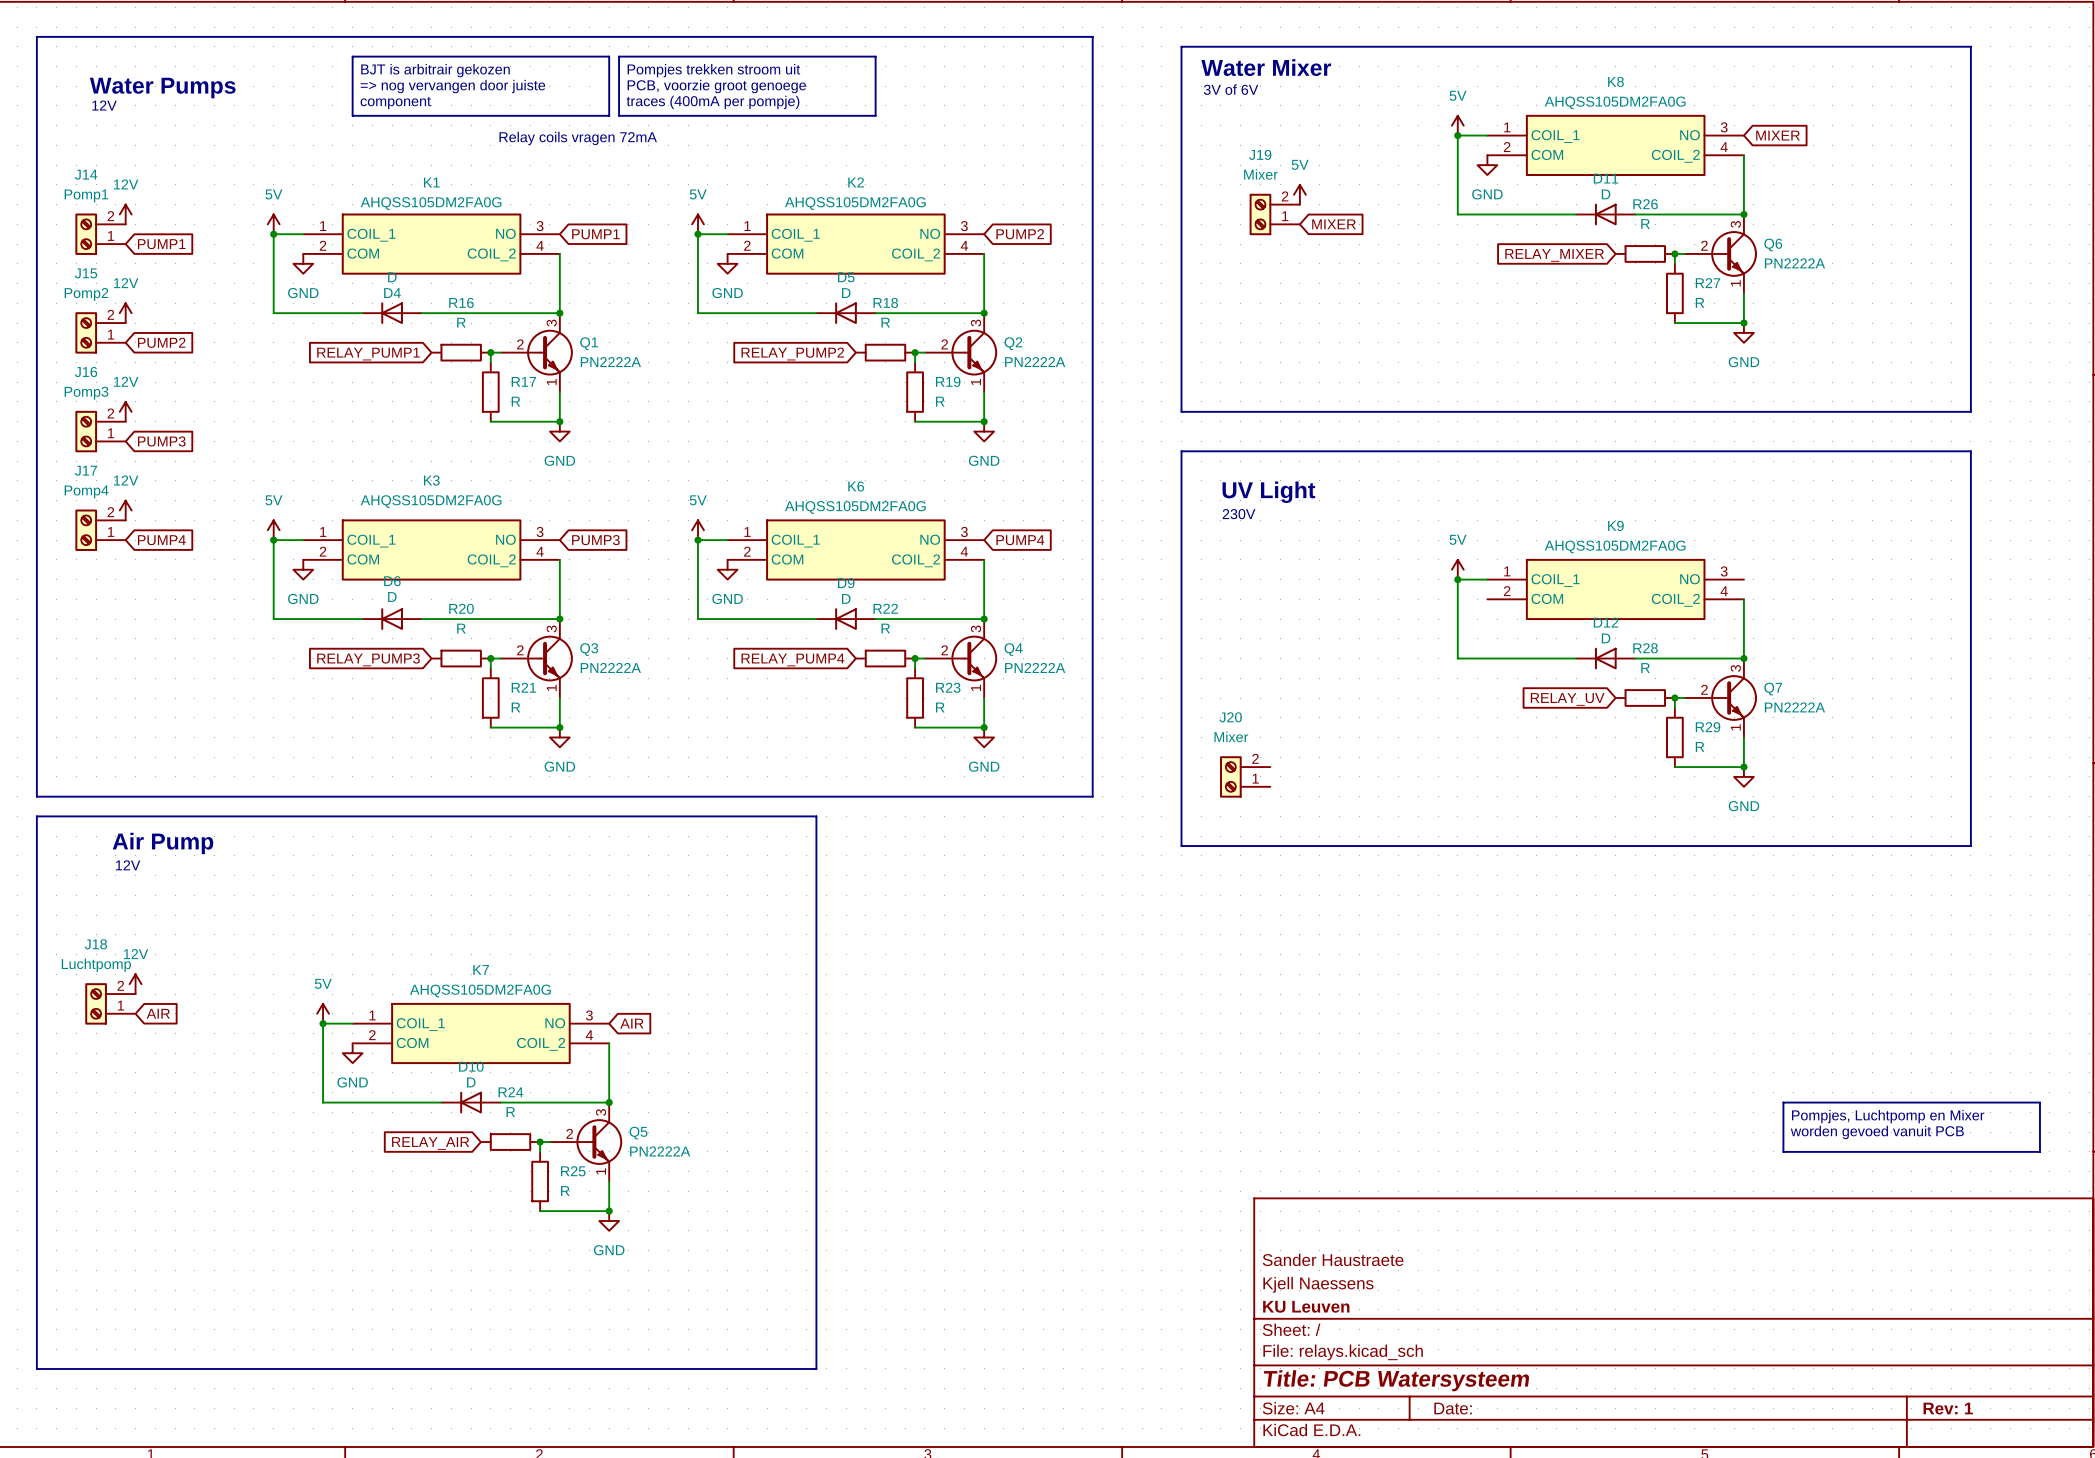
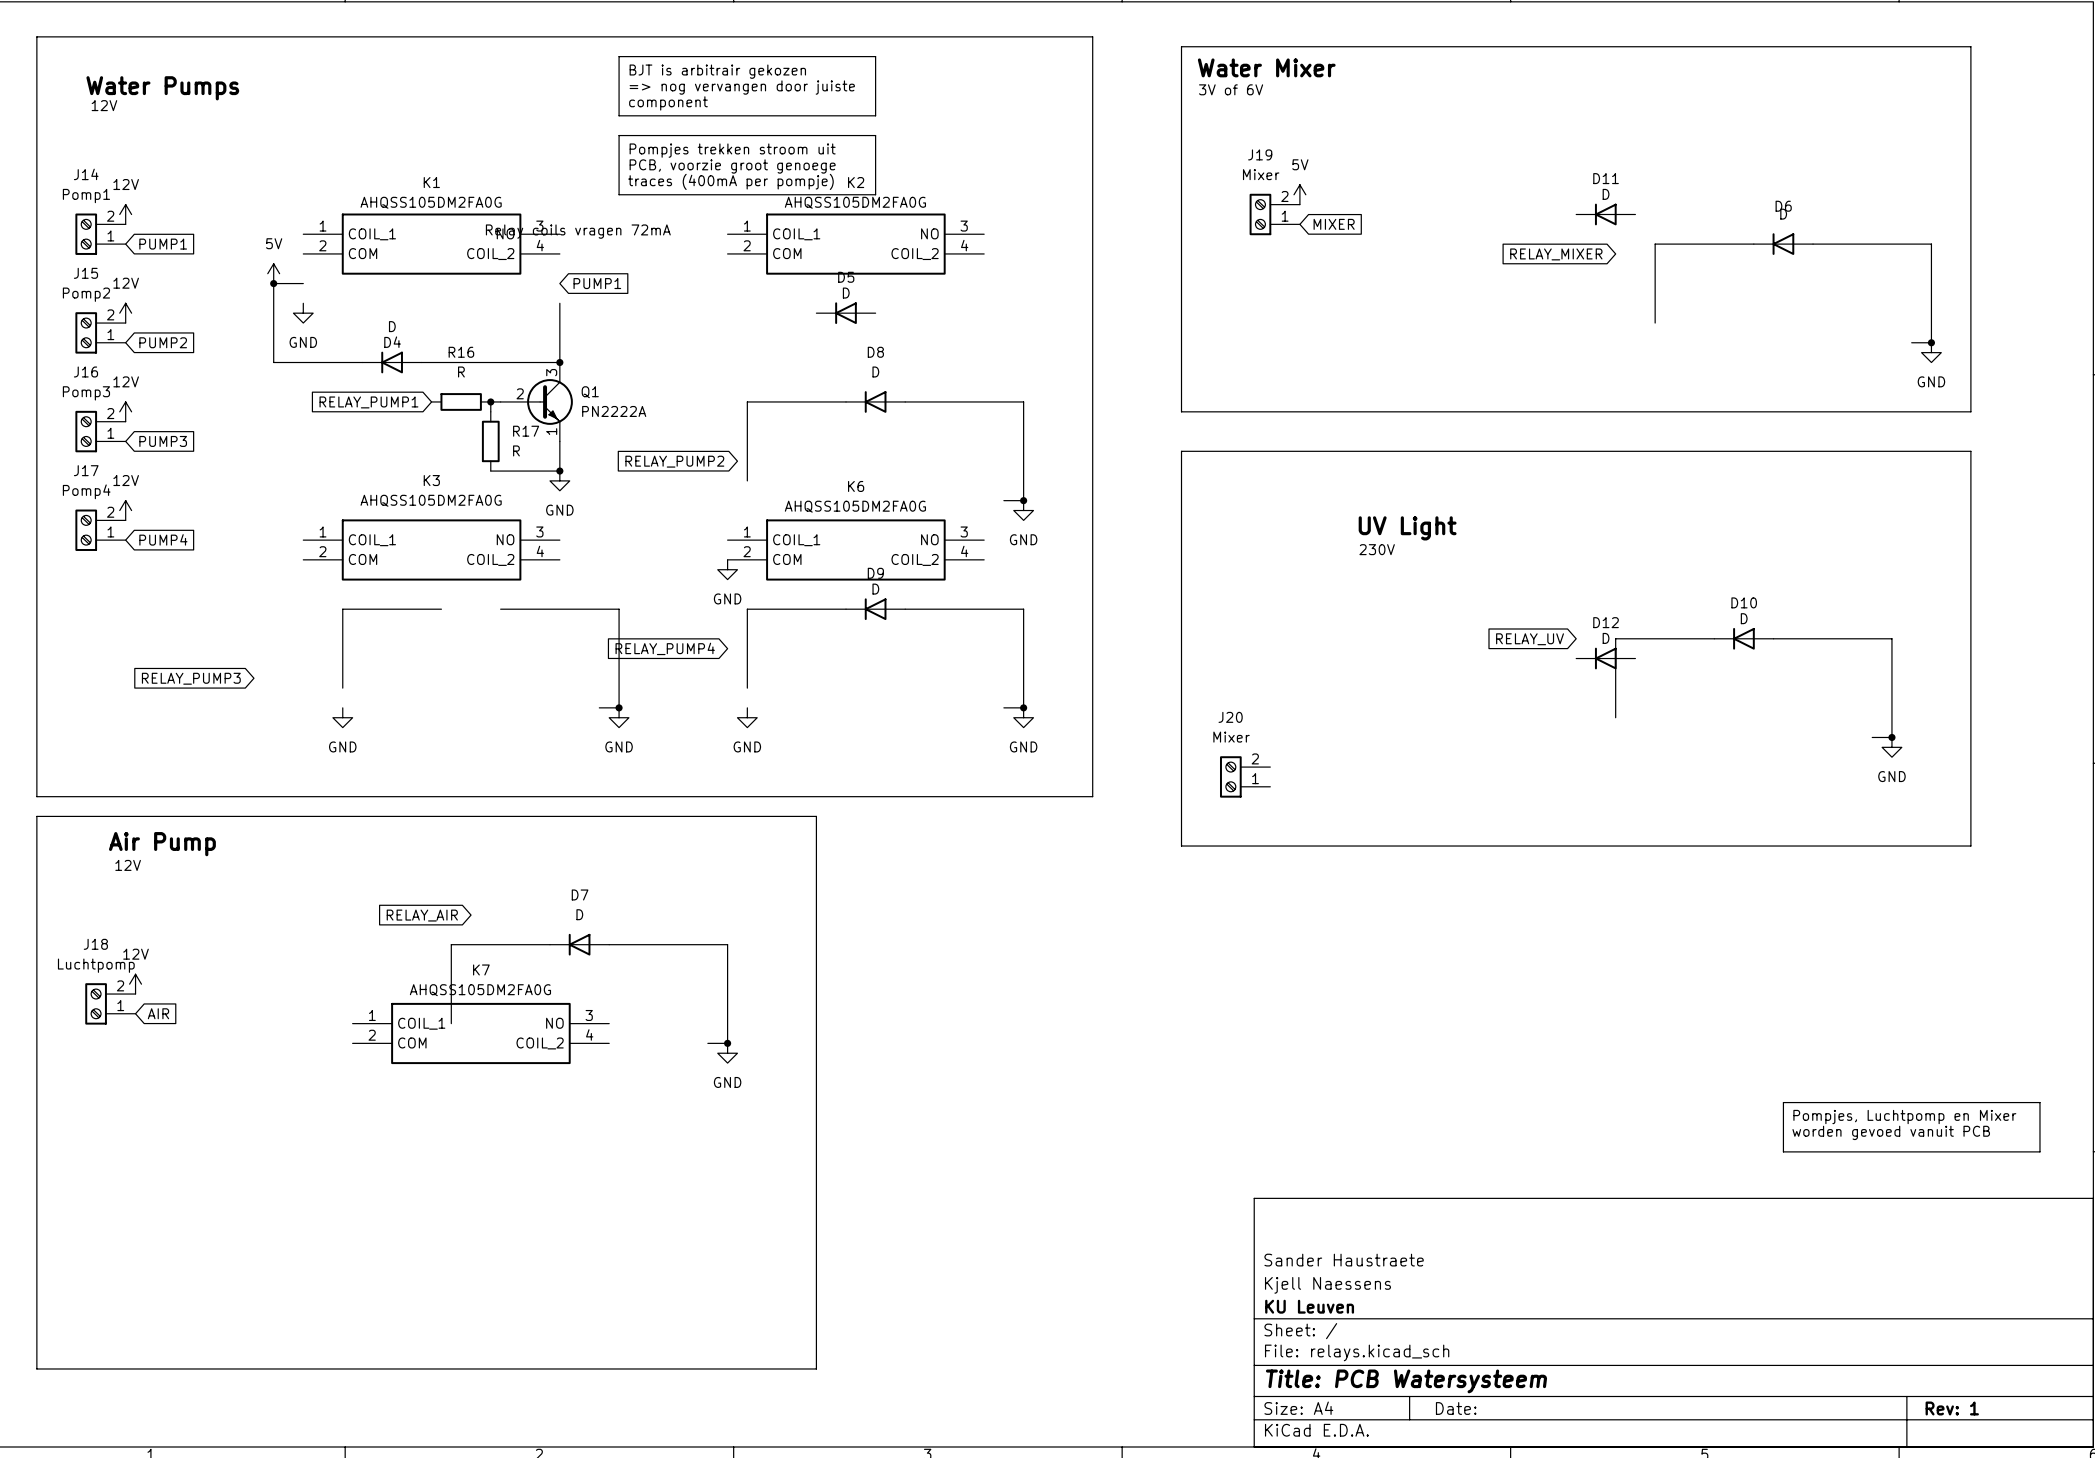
line: (352, 56) (609, 56) (609, 115) (352, 115) (352, 56) -> none
text: BJT is arbitrair gekozen (435, 70) -> none
text position: Pompjes trekken stroom uit (713, 70) -> Pompjes trekken stroom uit (732, 150)
text: none -> BJT is arbitrair gekozen (717, 71)
text: => nog vervangen door juiste (452, 86) -> none
text position: PCB, voorzie groot genoege (716, 86) -> PCB, voorzie groot genoege (732, 166)
text: none -> => nog vervangen door juiste (742, 87)
text: component (395, 102) -> none
text position: traces (400mA per pompje) (713, 102) -> traces (400mA per pompje) (730, 181)
text: none -> component (668, 103)
power symbol: 5V (1457, 125) -> none
line: none -> (619, 135) (875, 135) (875, 194) (619, 194) (619, 135)
junction: (1457, 135) -> none
wire: (1487, 135) (1457, 135) (1457, 214) (1576, 214) -> none
global label: MIXER (1778, 135) -> none
text position: Relay coils vragen 72mA (578, 138) -> Relay coils vragen 72mA (578, 231)
K8: AHQSS105DM2FA0G (1615, 145) -> none
wire: (1743, 155) (1743, 214) (1635, 214) -> none
power symbol: GND (1487, 165) -> none
junction: (1743, 214) -> none
power symbol position: 5V (273, 224) -> 5V (273, 273)
power symbol: 5V (698, 224) -> none
junction: (273, 234) -> none
wire: (303, 234) (273, 234) (273, 283) -> (303, 283) (273, 283)
global label position: PUMP1 (595, 234) -> PUMP1 (597, 283)
junction: (698, 234) -> none
wire: (727, 234) (698, 234) (698, 313) (816, 313) -> none
global label: PUMP2 (1020, 234) -> none
wire: none -> (1753, 244) (1655, 244) (1655, 323)
wire: none -> (1813, 244) (1931, 244) (1931, 342) (1911, 342)
wire: (559, 253) (559, 303) -> none
wire: (984, 253) (984, 313) (875, 313) -> none
R26: R (1645, 253) -> none
junction: (1674, 253) -> none
wire: (1684, 253) (1674, 253) (1674, 263) -> none
Q6: PN2222A (1720, 253) -> none
power symbol position: GND (303, 263) -> GND (303, 313)
power symbol: GND (727, 263) -> none
junction: none -> (273, 283)
R27: R (1674, 293) -> none
wire: (1743, 293) (1743, 323) (1674, 323) -> none
wire: (273, 313) (362, 313) -> (273, 313) (273, 362) (362, 362)
D4 position: (392, 313) -> (392, 362)
wire: (421, 313) (559, 313) -> (421, 362) (559, 362) (559, 313)
junction: (559, 313) -> none
junction: (984, 313) -> none
junction: (1743, 323) -> none
power symbol position: GND (1743, 332) -> GND (1931, 352)
junction: none -> (1931, 342)
R16 position: (461, 352) -> (461, 401)
junction: (490, 352) -> none
wire: (500, 352) (490, 352) (490, 362) -> (500, 401) (490, 401) (490, 411)
Q1 position: (536, 352) -> (536, 401)
R18: R (885, 352) -> none
junction: (915, 352) -> none
wire: (924, 352) (915, 352) (915, 362) -> none
Q2: PN2222A (961, 352) -> none
global label position: RELAY_PUMP2 (792, 353) -> RELAY_PUMP2 (674, 461)
global label position: RELAY_PUMP1 (368, 354) -> RELAY_PUMP1 (368, 402)
junction: none -> (559, 362)
R17 position: (490, 392) -> (490, 441)
wire: (559, 392) (559, 421) (490, 421) -> (559, 441) (559, 471) (490, 471)
R19: R (915, 392) -> none
wire: (984, 392) (984, 421) (915, 421) -> none
junction: none -> (490, 401)
wire: none -> (846, 401) (747, 401) (747, 480)
D8: none -> D (875, 401)
wire: none -> (905, 401) (1023, 401) (1023, 500) (1003, 500)
junction: (559, 421) -> none
junction: (984, 421) -> none
power symbol position: GND (559, 431) -> GND (559, 480)
power symbol position: GND (984, 431) -> GND (1023, 510)
junction: none -> (559, 471)
text position: UV Light (1268, 492) -> UV Light (1407, 528)
junction: none -> (1023, 500)
text position: 230V (1239, 514) -> 230V (1377, 549)
power symbol: 5V (273, 530) -> none
power symbol: 5V (698, 530) -> none
junction: (273, 540) -> none
wire: (303, 540) (273, 540) (273, 619) (362, 619) -> none
global label: PUMP3 (595, 540) -> none
junction: (698, 540) -> none
wire: (727, 540) (698, 540) (698, 619) (816, 619) -> none
global label: PUMP4 (1020, 540) -> none
wire: (559, 559) (559, 619) (421, 619) -> none
wire: (984, 559) (984, 619) (875, 619) -> none
power symbol: GND (303, 569) -> none
power symbol: 5V (1457, 569) -> none
junction: (1457, 579) -> none
wire: (1487, 579) (1457, 579) (1457, 658) (1576, 658) -> none
K9: AHQSS105DM2FA0G (1615, 589) -> none
D6 value position: D (392, 596) -> D (1783, 214)
wire: (1743, 599) (1743, 658) (1635, 658) -> none
wire: none -> (441, 609) (342, 609) (342, 688)
wire: none -> (500, 609) (619, 609) (619, 707) (599, 707)
wire: none -> (846, 609) (747, 609) (747, 688)
wire: none -> (905, 609) (1023, 609) (1023, 707) (1003, 707)
D6 position: (392, 619) -> (1783, 244)
junction: (559, 619) -> none
D9 position: (846, 619) -> (875, 609)
junction: (984, 619) -> none
wire: none -> (1714, 638) (1615, 638) (1615, 717)
wire: none -> (1773, 638) (1891, 638) (1891, 737) (1872, 737)
R20: R (461, 658) -> none
junction: (490, 658) -> none
wire: (500, 658) (490, 658) (490, 668) -> none
Q3: PN2222A (536, 658) -> none
R22: R (885, 658) -> none
junction: (915, 658) -> none
wire: (924, 658) (915, 658) (915, 668) -> none
Q4: PN2222A (961, 658) -> none
junction: (1743, 658) -> none
global label position: RELAY_PUMP3 (368, 659) -> RELAY_PUMP3 (191, 678)
global label position: RELAY_PUMP4 (792, 659) -> RELAY_PUMP4 (665, 648)
R21: R (490, 698) -> none
wire: (559, 698) (559, 727) (490, 727) -> none
R23: R (915, 698) -> none
wire: (984, 698) (984, 727) (915, 727) -> none
R28: R (1645, 698) -> none
junction: (1674, 698) -> none
wire: (1684, 698) (1674, 698) (1674, 707) -> none
Q7: PN2222A (1720, 698) -> none
global label position: RELAY_UV (1567, 699) -> RELAY_UV (1530, 639)
junction: none -> (619, 707)
power symbol: none -> GND (342, 717)
power symbol: none -> GND (747, 717)
junction: (559, 727) -> none
junction position: (984, 727) -> (1023, 707)
power symbol position: GND (559, 737) -> GND (619, 717)
power symbol position: GND (984, 737) -> GND (1023, 717)
R29: R (1674, 737) -> none
wire: (1743, 737) (1743, 767) (1674, 767) -> none
junction: none -> (1891, 737)
junction: (1743, 767) -> none
power symbol position: GND (1743, 776) -> GND (1891, 747)
global label: none -> RELAY_AIR (422, 915)
wire: none -> (549, 944) (451, 944) (451, 1023)
D7: none -> D (579, 944)
wire: none -> (609, 944) (727, 944) (727, 1043) (707, 1043)
power symbol: 5V (323, 1013) -> none
junction: (323, 1023) -> none
wire: (352, 1023) (323, 1023) (323, 1102) (441, 1102) -> none
global label: AIR (631, 1023) -> none
wire: (609, 1043) (609, 1102) (500, 1102) -> none
junction: none -> (727, 1043)
power symbol: GND (352, 1053) -> none
power symbol: none -> GND (727, 1053)
D10 position: (471, 1102) -> (1743, 638)
junction: (609, 1102) -> none
R24: R (510, 1142) -> none
junction: (540, 1142) -> none
wire: (549, 1142) (540, 1142) (540, 1151) -> none
Q5: PN2222A (586, 1142) -> none
global label: RELAY_AIR (430, 1143) -> none
R25: R (540, 1181) -> none
wire: (609, 1181) (609, 1211) (540, 1211) -> none
junction: (609, 1211) -> none
power symbol: GND (609, 1220) -> none

